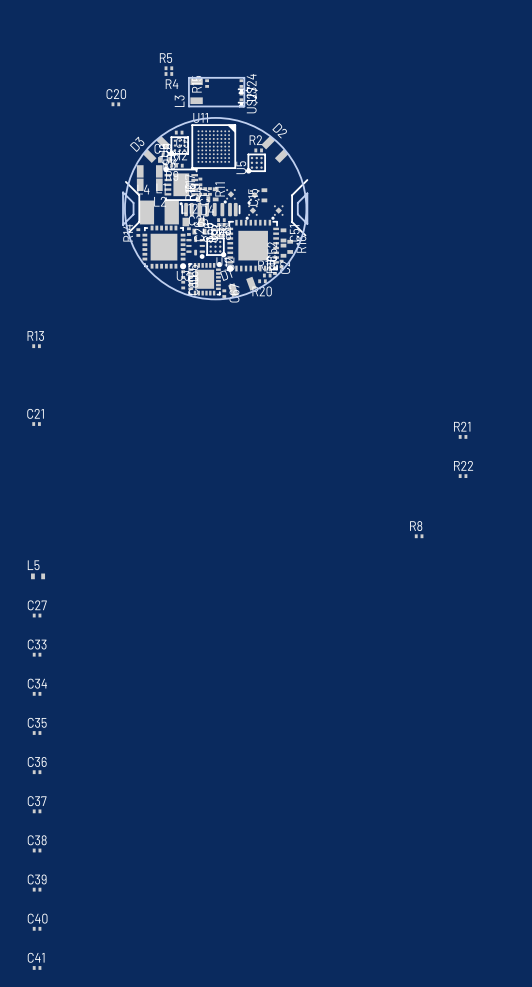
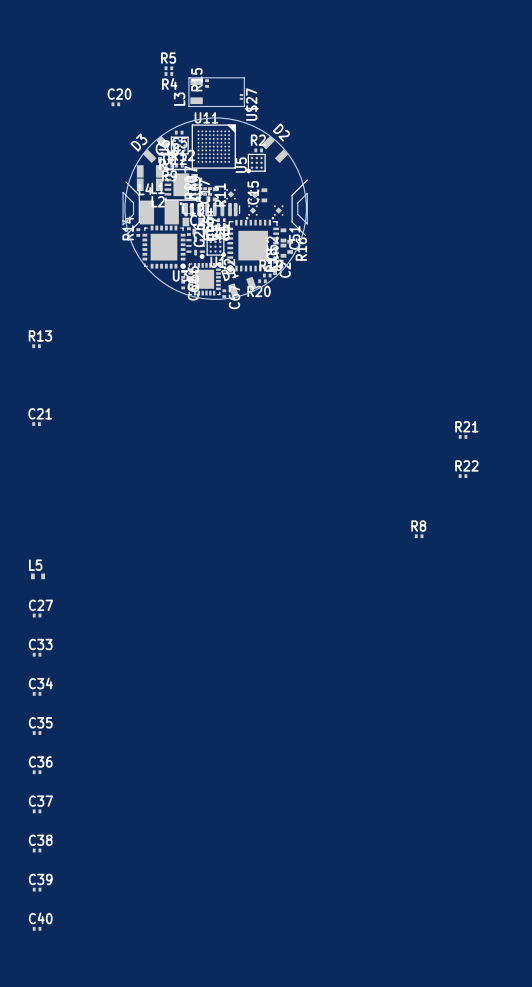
U$24: (241, 86) -> none
U$27 footprint: [237, 92, 245, 108] -> [239, 94, 244, 100]
C41: (37, 967) -> none

